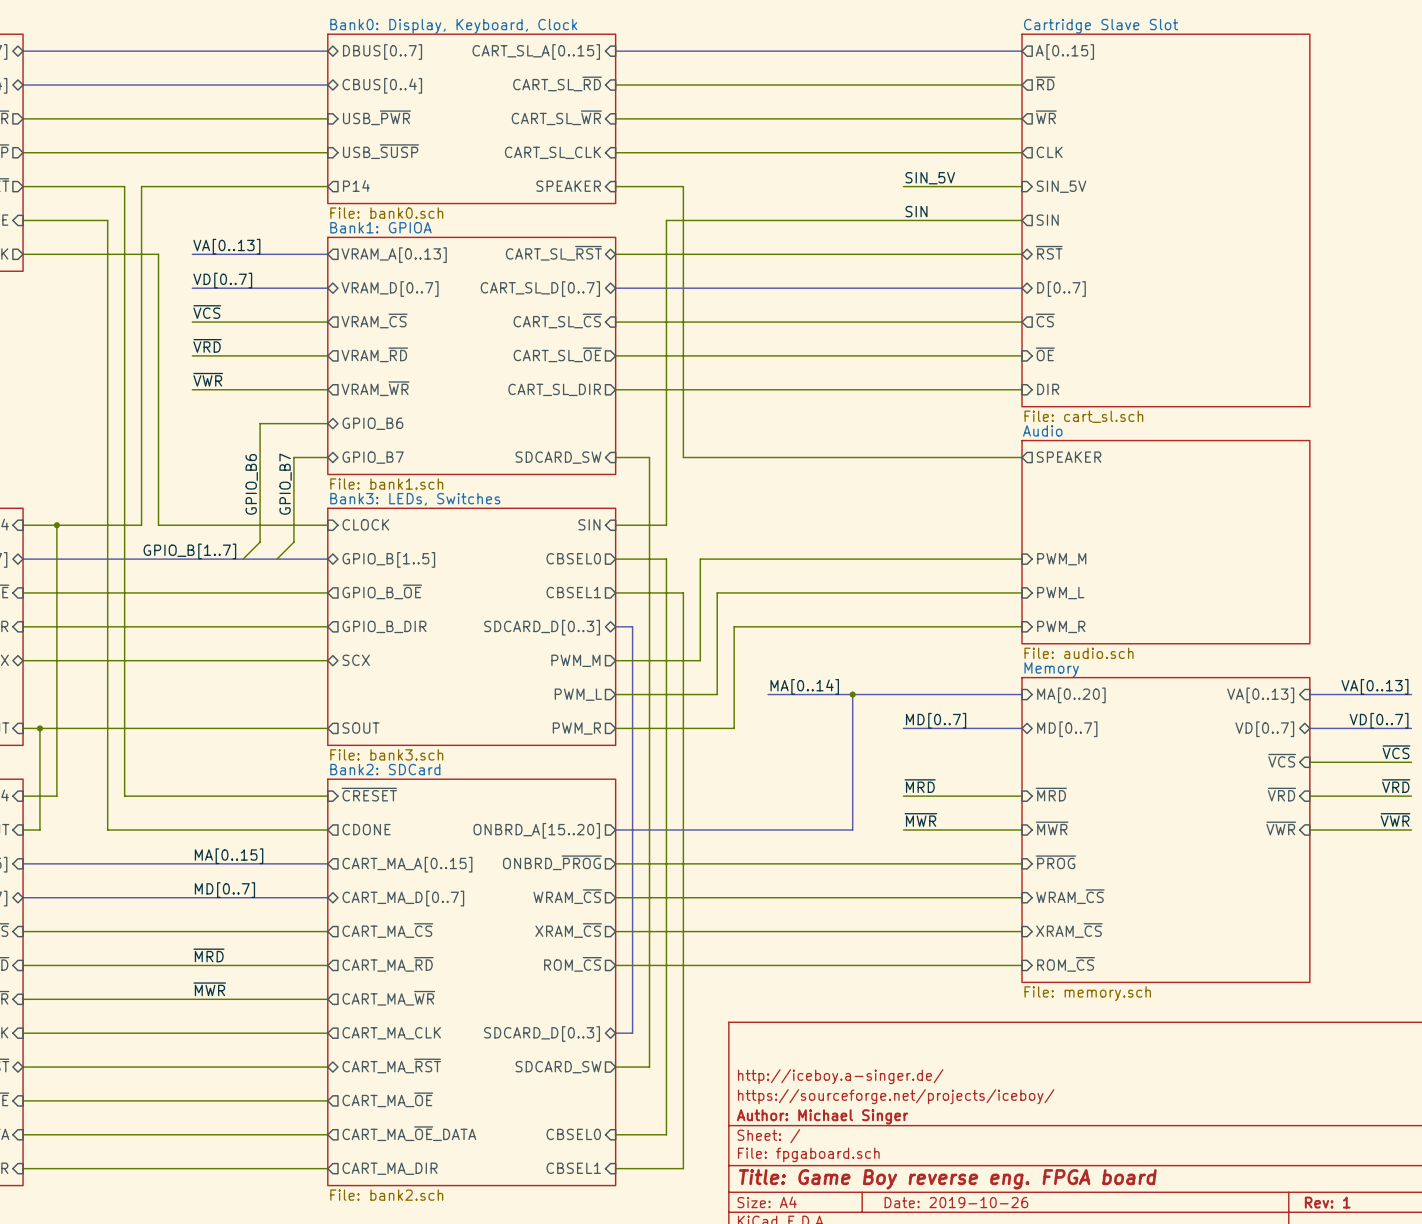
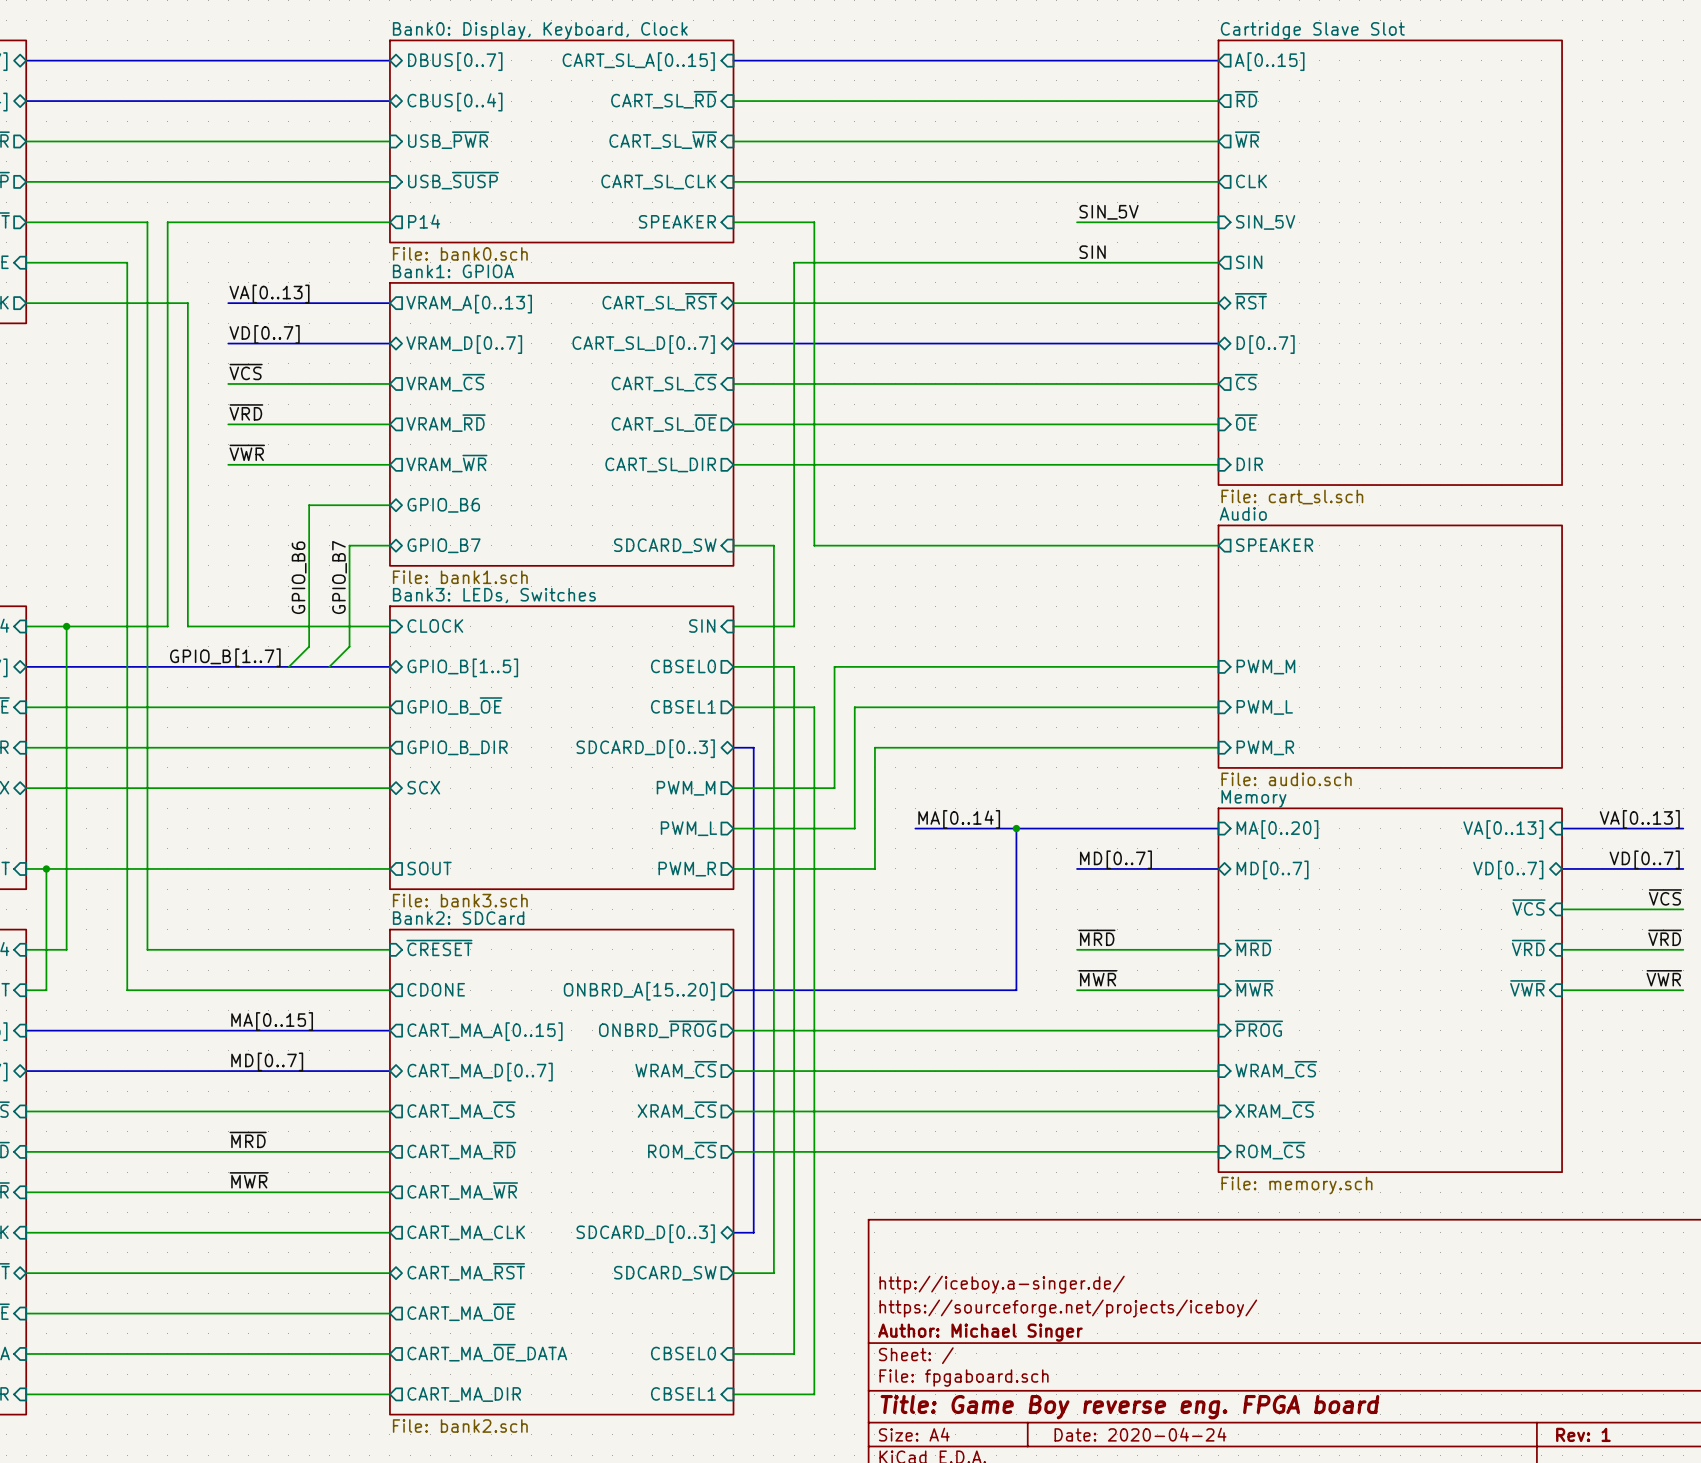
title block: Date: 2019-10-26 (956, 1202) -> Date: 2020-04-24 (1140, 1434)

